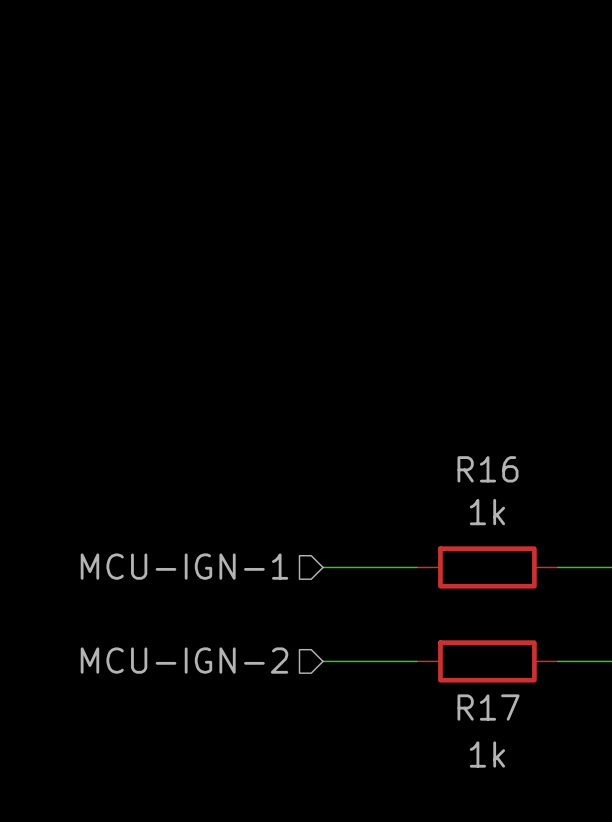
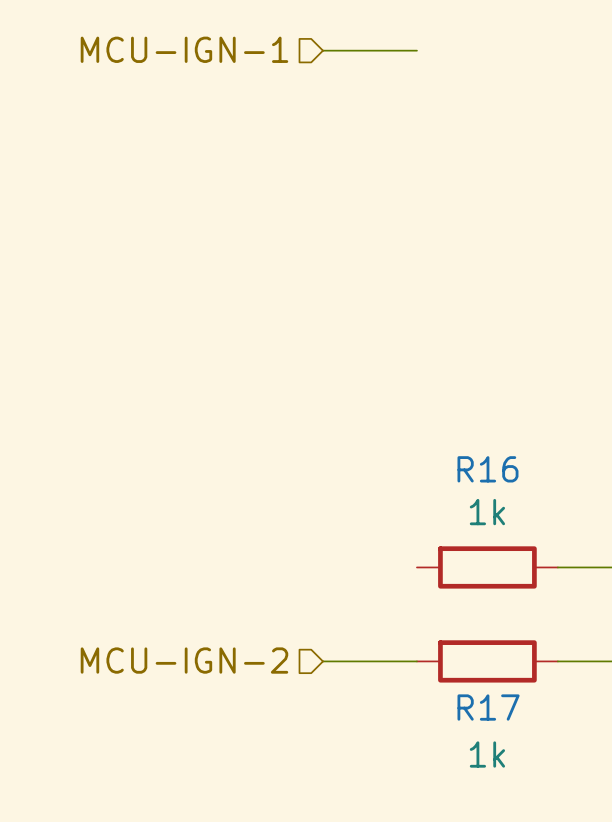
hierarchical label: none -> MCU-IGN-1 (184, 49)
wire: none -> (322, 50) (416, 50)
hierarchical label: MCU-IGN-1 (184, 566) -> none
wire: (322, 567) (416, 567) -> none

